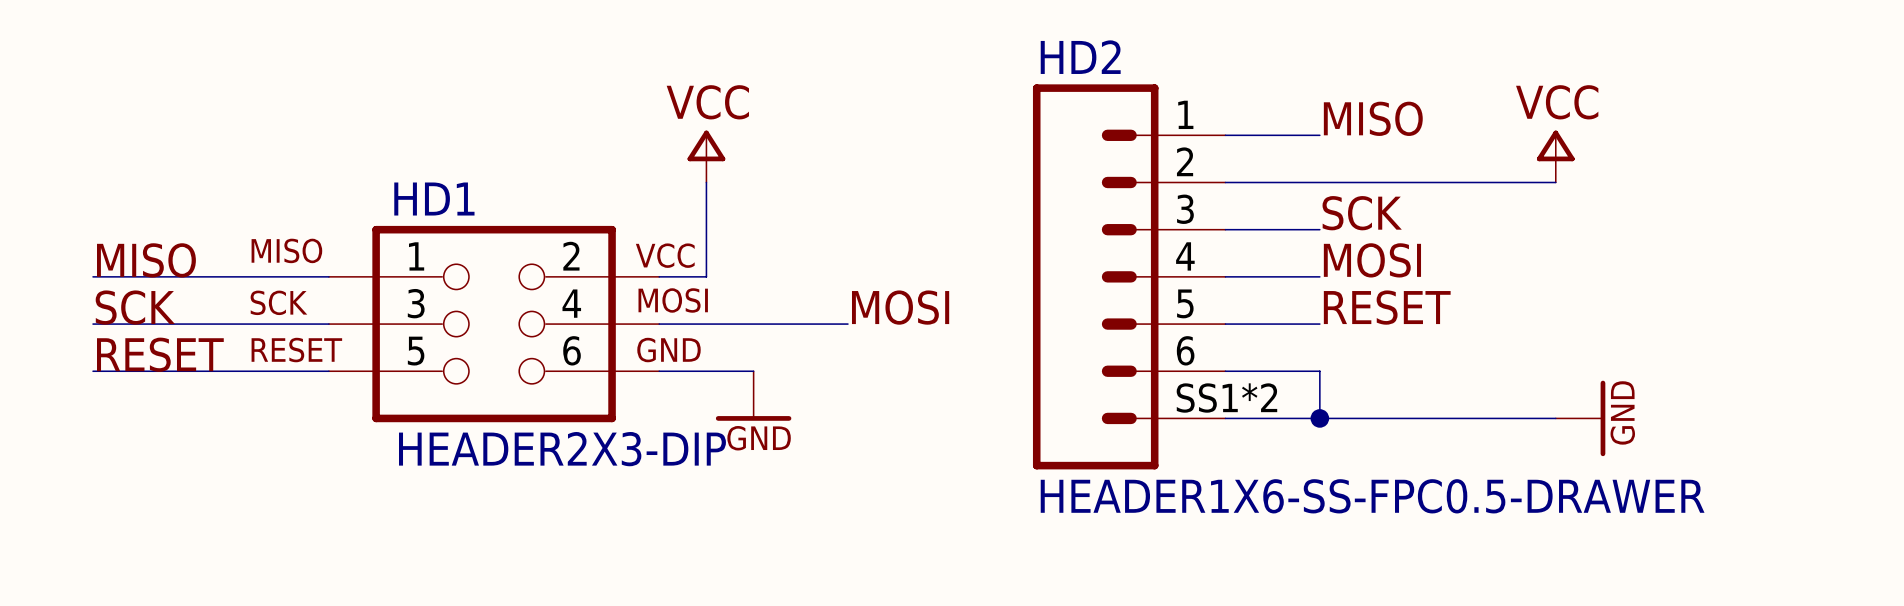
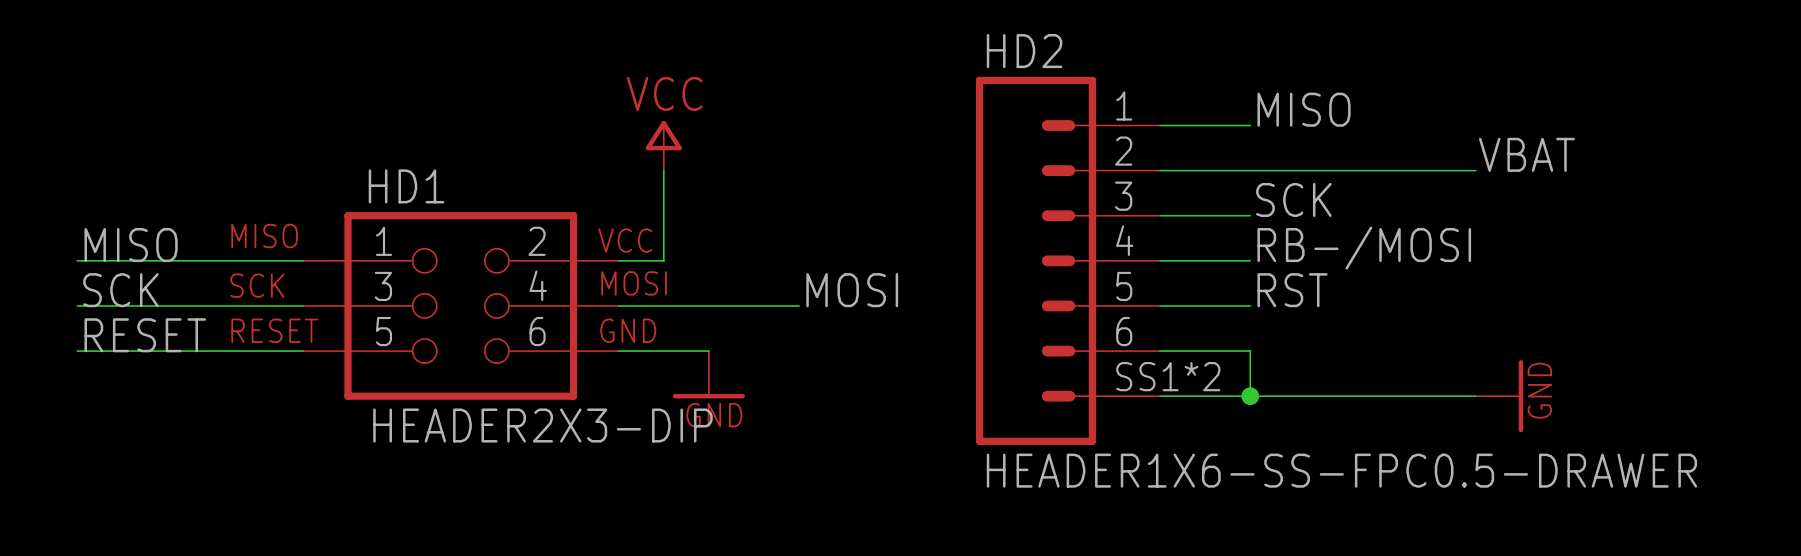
power symbol: (1555, 156) -> none
label: none -> VBAT (1526, 154)
label: MOSI (1372, 260) -> RB-/MOSI (1364, 248)
label: RESET (1387, 307) -> RST (1292, 290)

